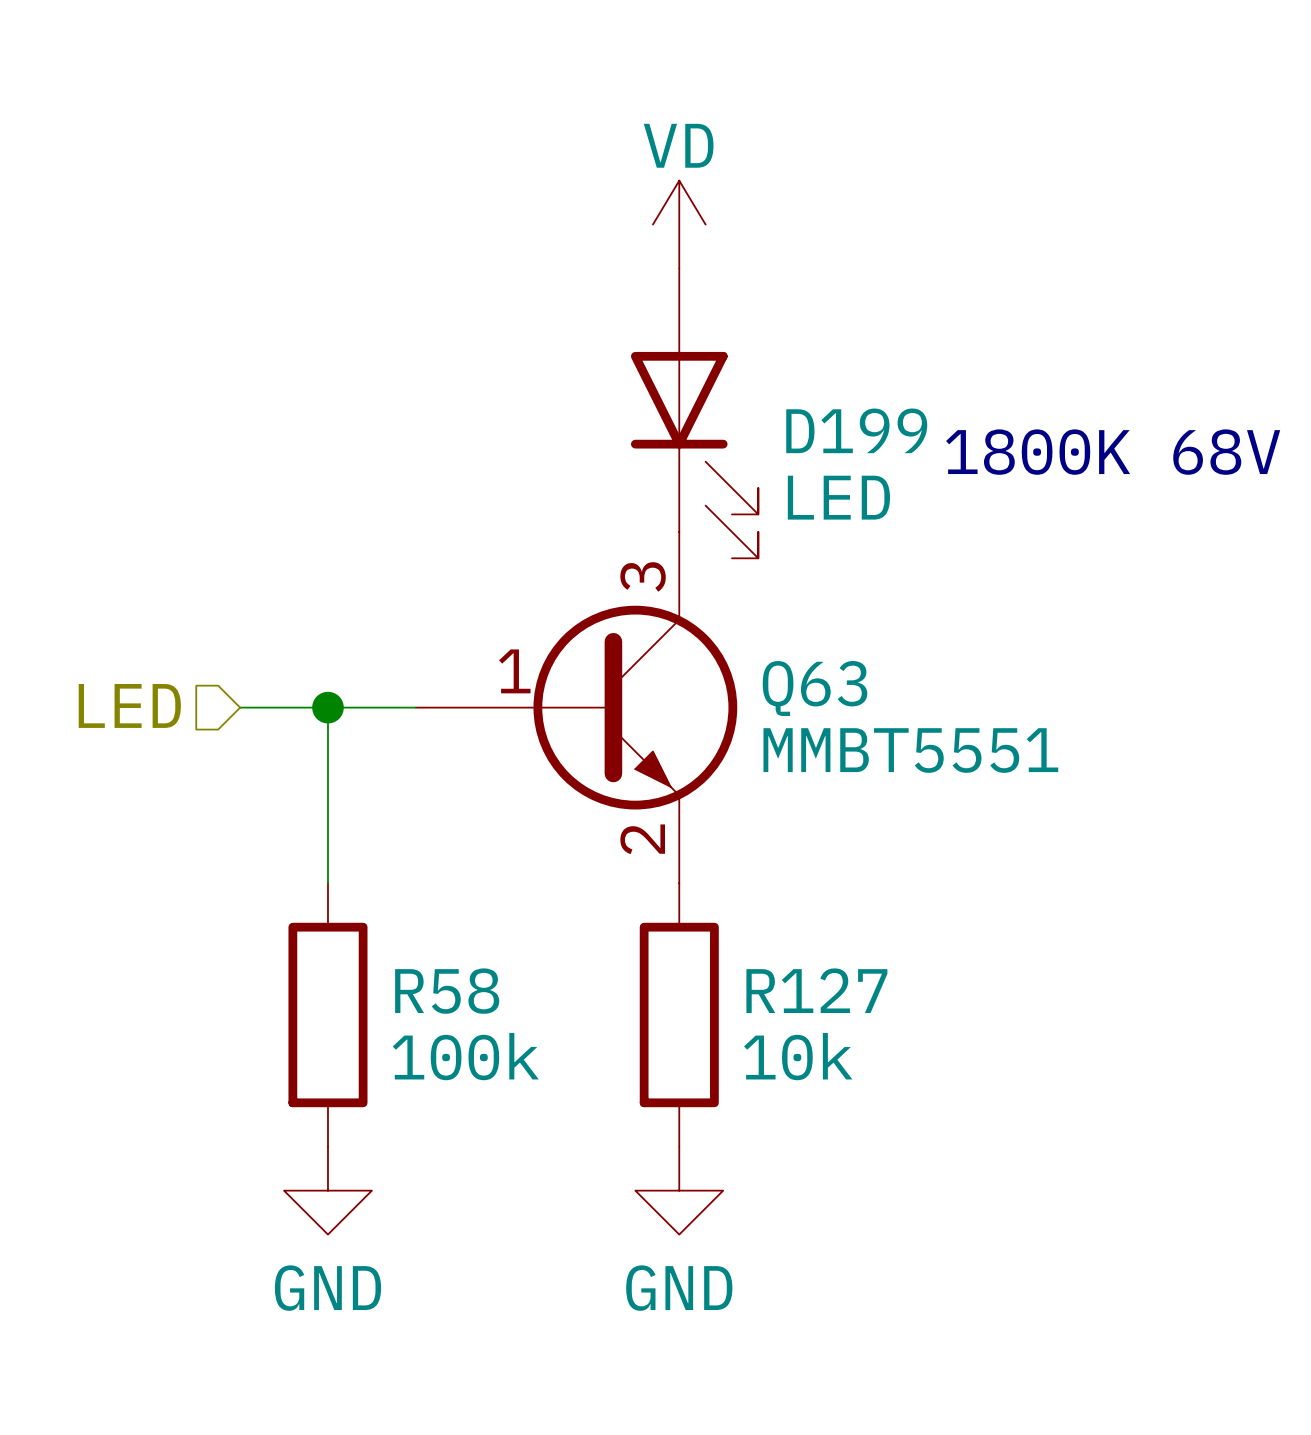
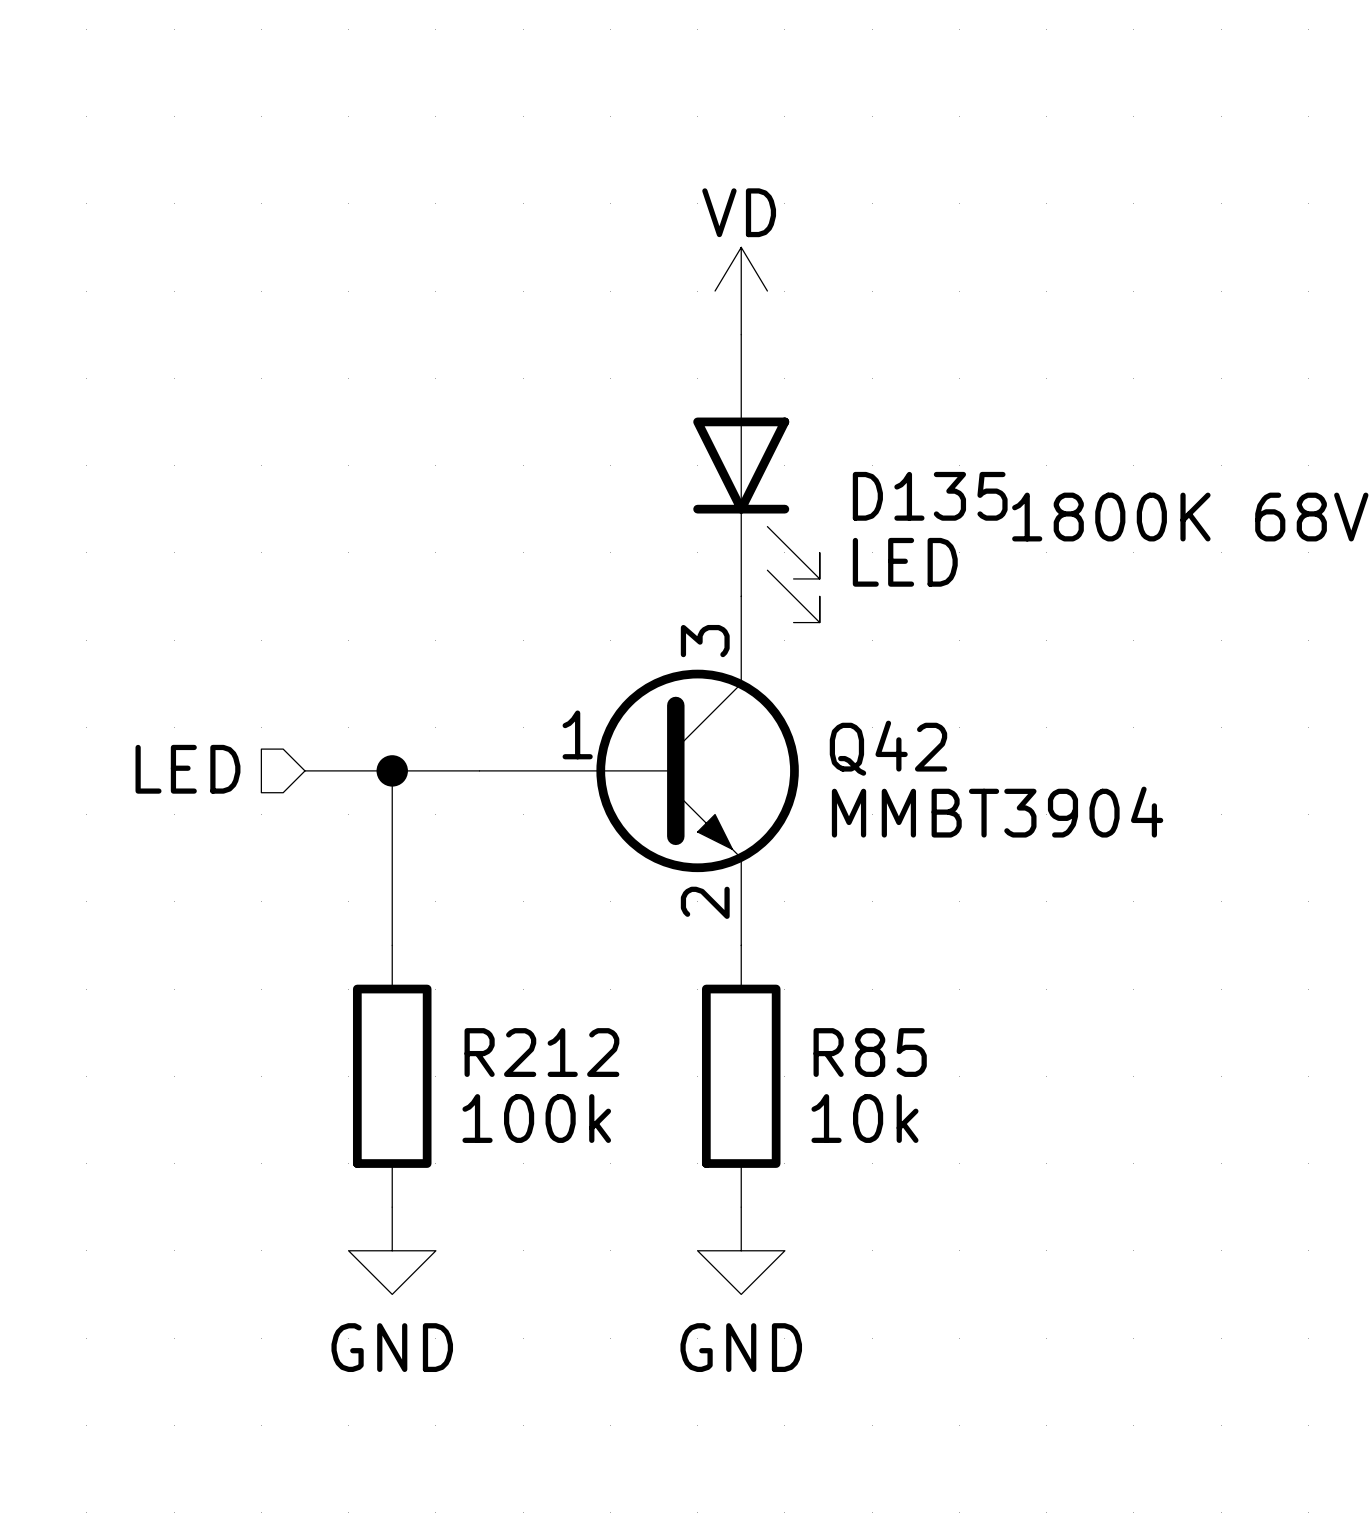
D199 name: D199 (856, 430) -> D135 (930, 496)
Q63 name: Q63 (815, 688) -> Q42 (888, 748)
Q63 value: MMBT5551 (910, 750) -> MMBT3904 (997, 812)
R127 name: R127 (816, 990) -> R85 (870, 1052)
R58 name: R58 (447, 991) -> R212 (541, 1052)

